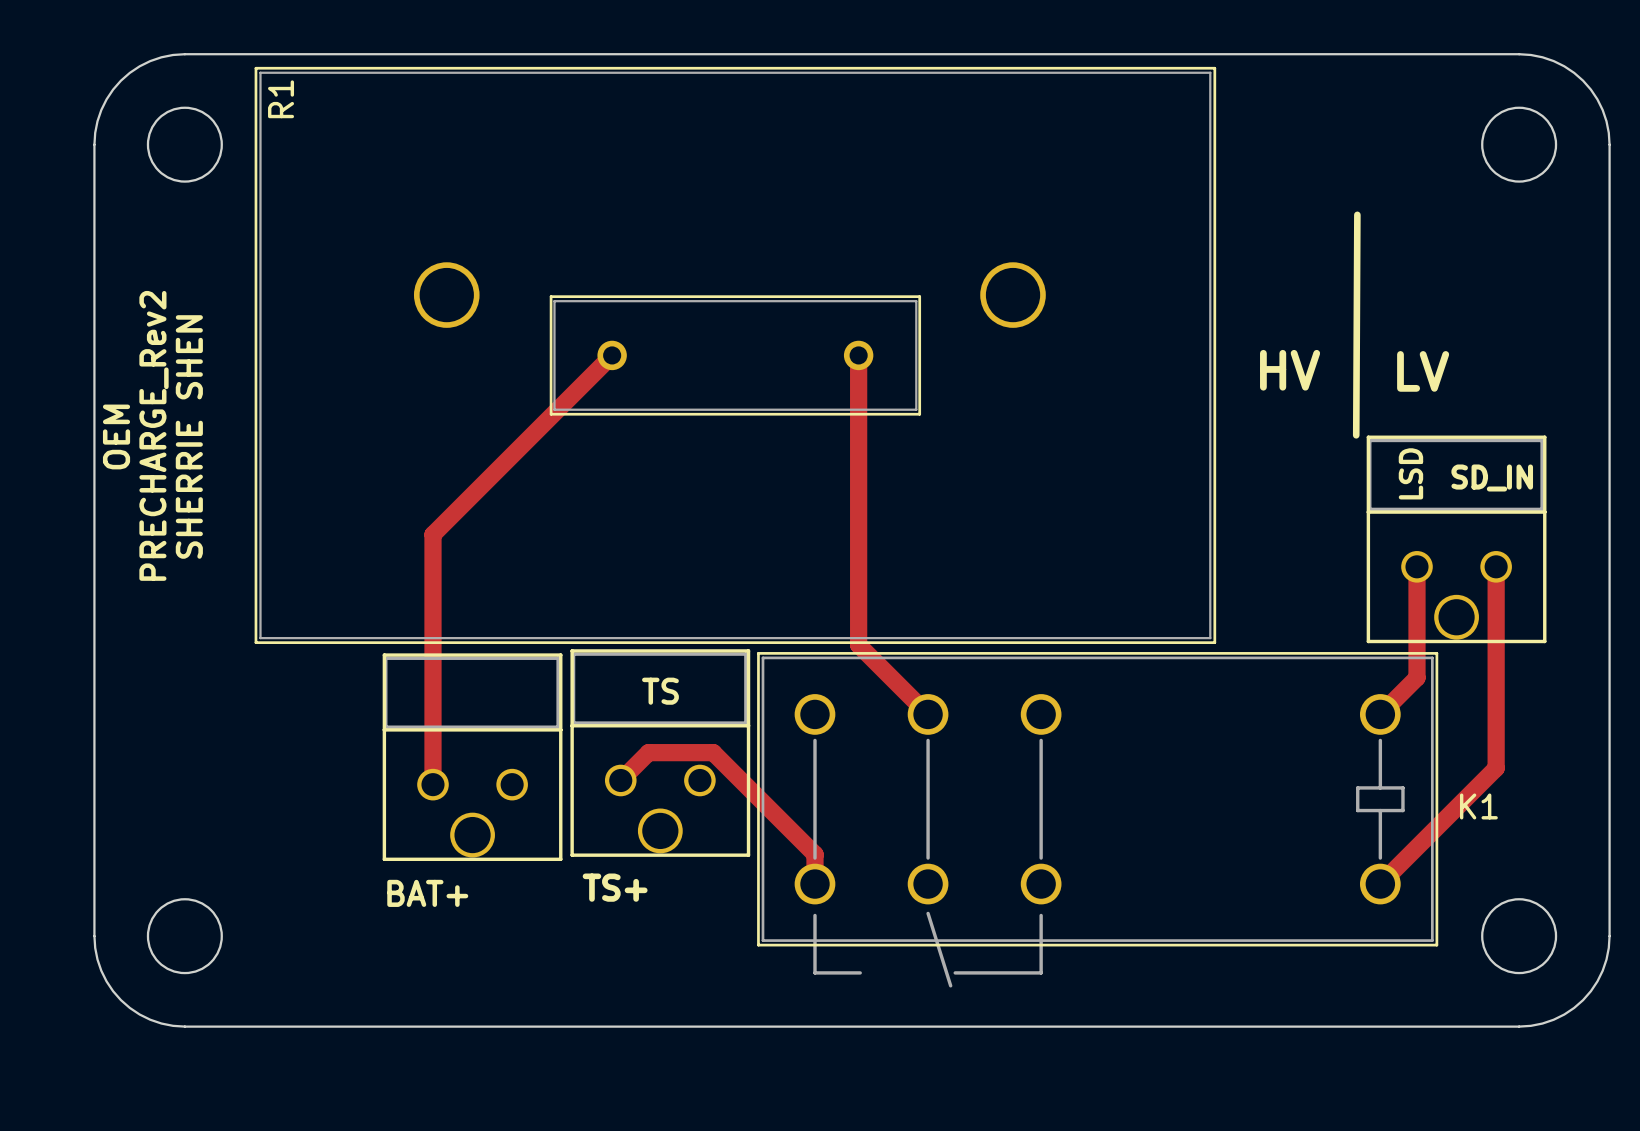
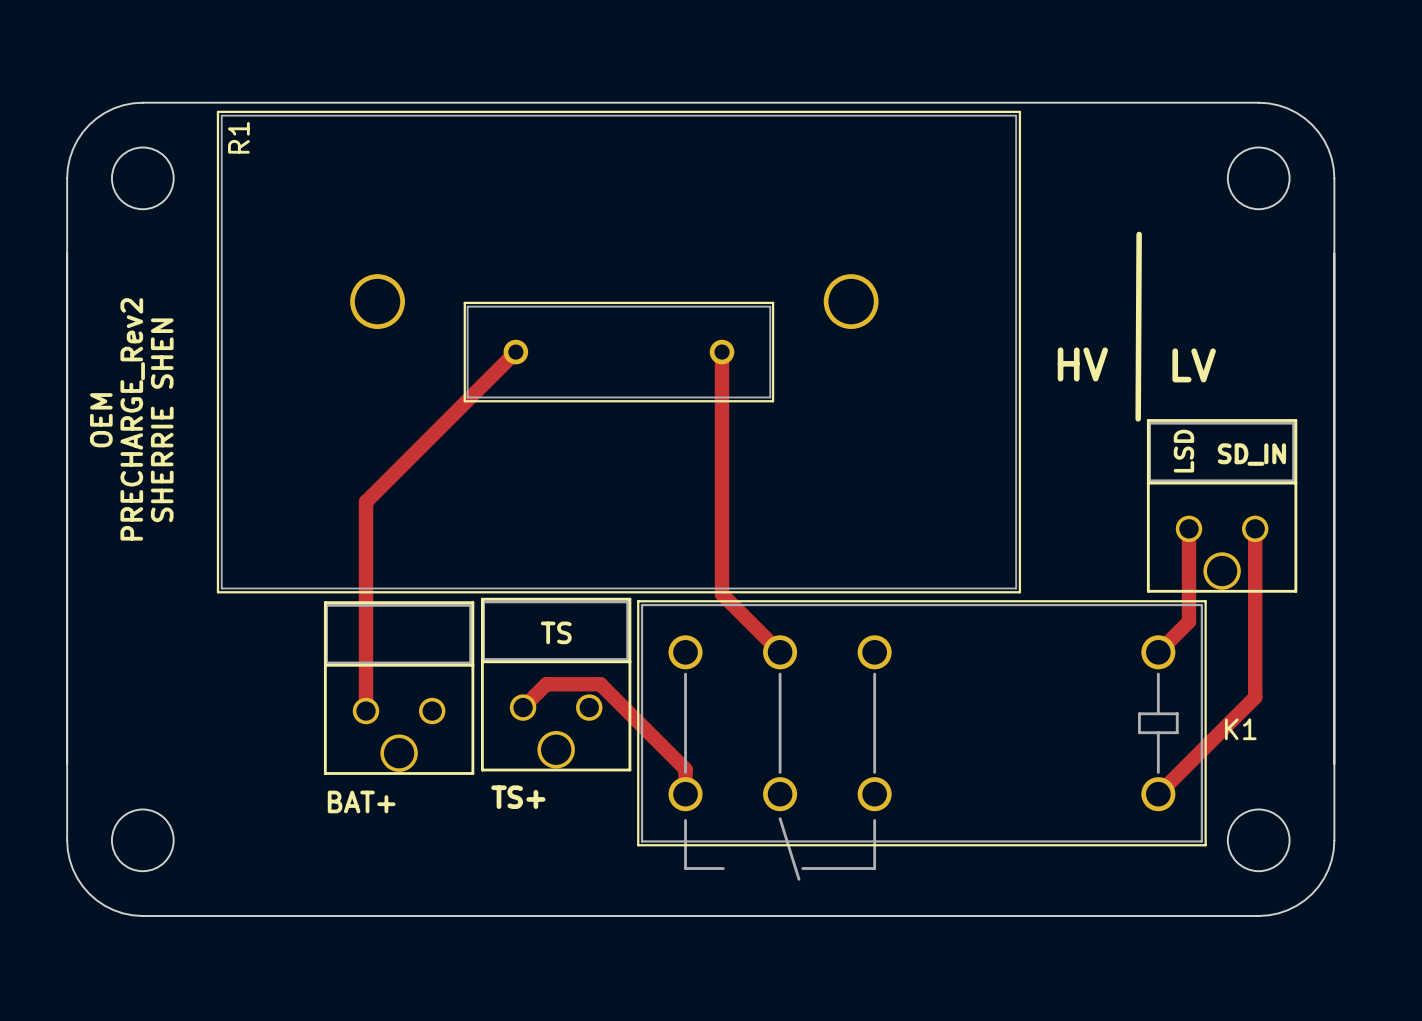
board edge: (184, 54) (1519, 54) (1542, 57) (1564, 66) (1583, 80) (1597, 99) (1606, 121) (1609, 144) (1609, 936) (1606, 959) (1597, 981) (1583, 1000) (1564, 1014) (1542, 1023) (1519, 1026) (184, 1026) (161, 1023) (139, 1014) (120, 1000) (106, 981) (97, 959) (94, 936) (94, 144) (97, 121) (101, 110) (113, 89) (120, 80) (129, 72) (150, 61) (161, 57) (184, 54) -> (142, 102) (1258, 102) (1278, 105) (1296, 112) (1312, 124) (1324, 140) (1331, 158) (1334, 178) (1334, 840) (1331, 859) (1324, 878) (1312, 893) (1296, 905) (1278, 913) (1258, 916) (142, 916) (123, 913) (104, 905) (89, 893) (77, 878) (69, 859) (67, 840) (67, 178) (72, 149) (89, 124) (113, 108) (142, 102)
round board edge position: (184, 144) -> (142, 178)
round board edge position: (1519, 144) -> (1258, 178)
round board edge position: (184, 936) -> (142, 840)
round board edge position: (1519, 936) -> (1258, 840)

